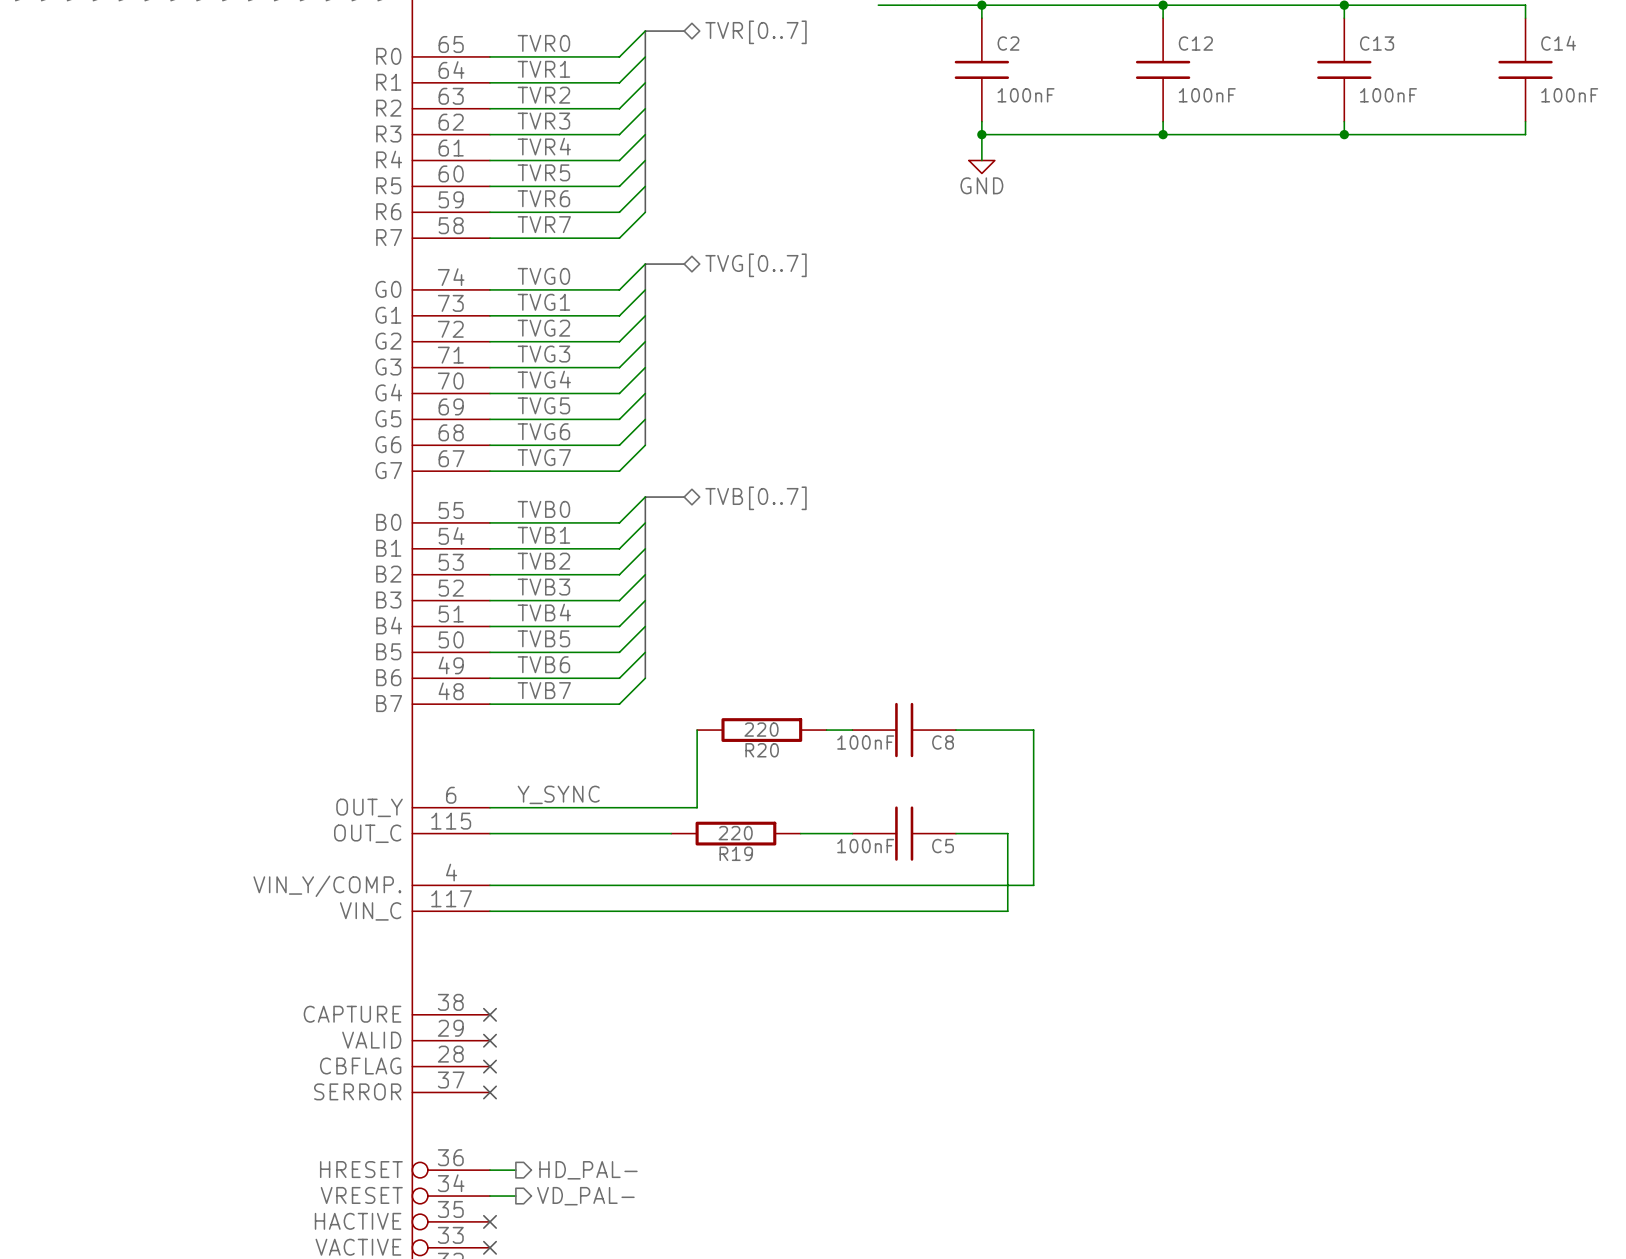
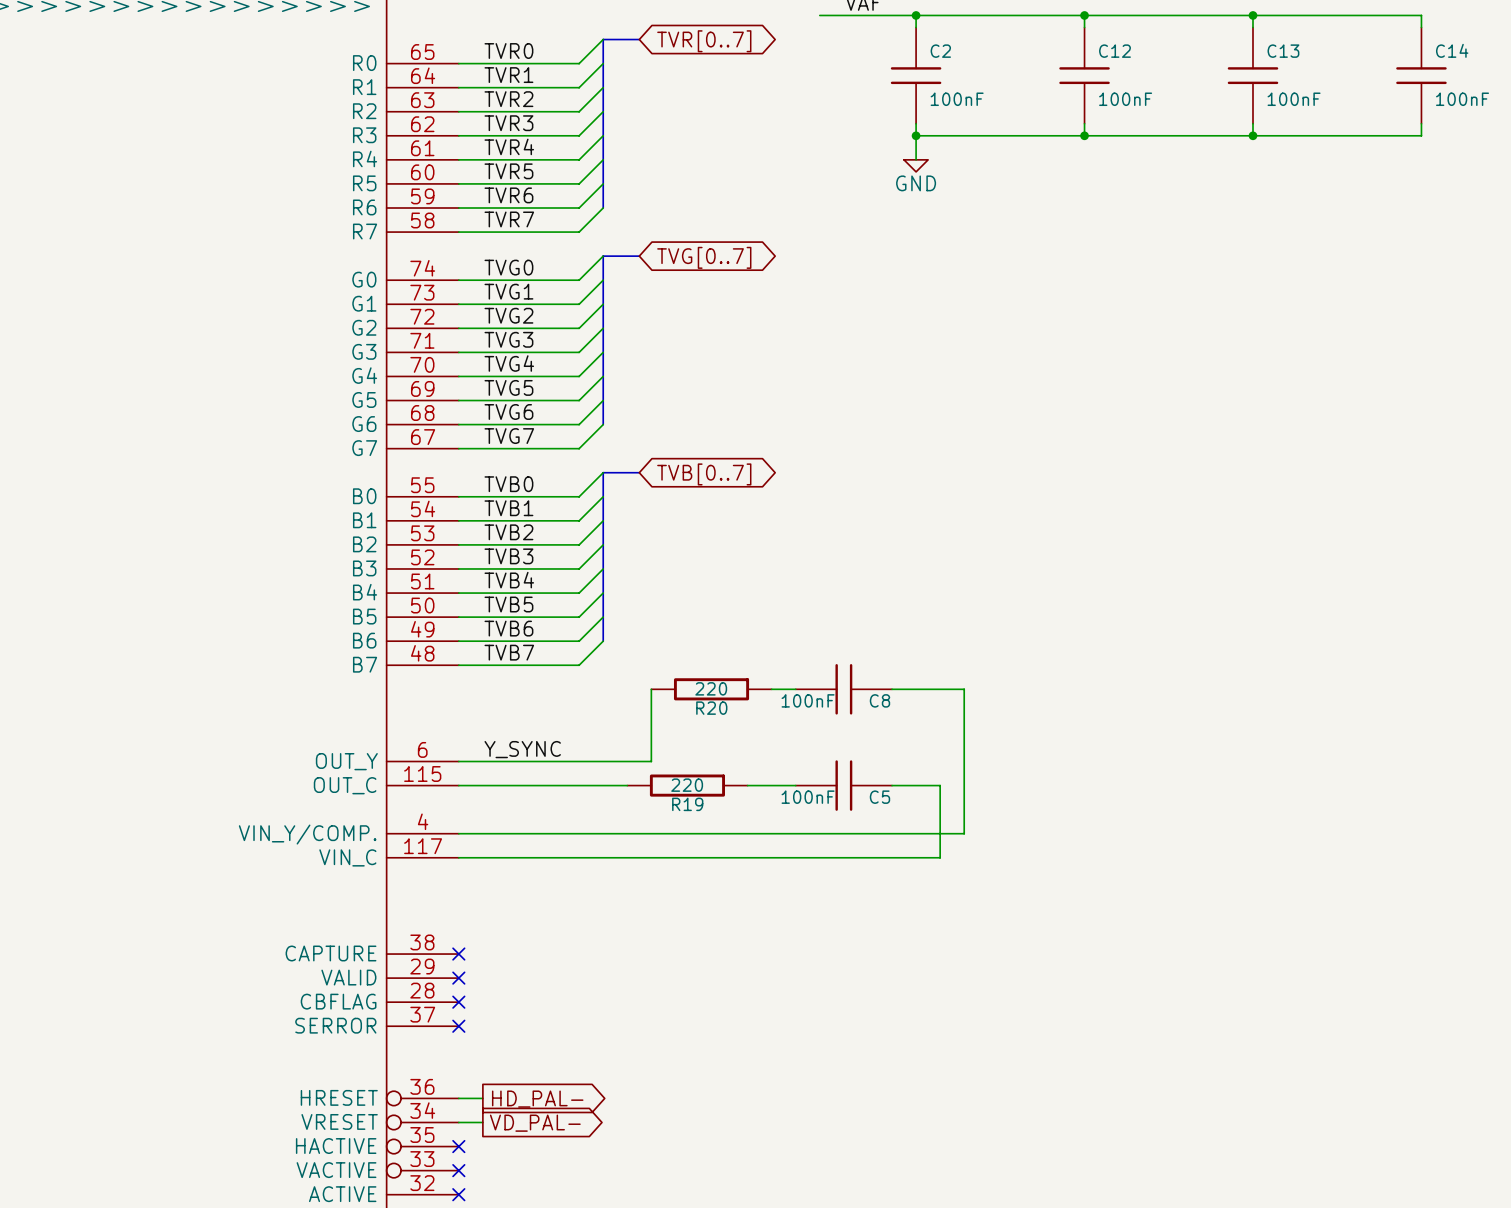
global label: none -> TVR[0..7] (704, 41)
hierarchical label: TVR[0..7] (756, 32) -> none
global label: none -> TVG[0..7] (704, 257)
hierarchical label: TVG[0..7] (756, 265) -> none
global label: none -> TVB[0..7] (704, 474)
hierarchical label: TVB[0..7] (756, 498) -> none
global label: none -> HD_PAL- (537, 1099)
hierarchical label: HD_PAL- (588, 1170) -> none
global label: none -> VD_PAL- (535, 1123)
hierarchical label: VD_PAL- (585, 1196) -> none

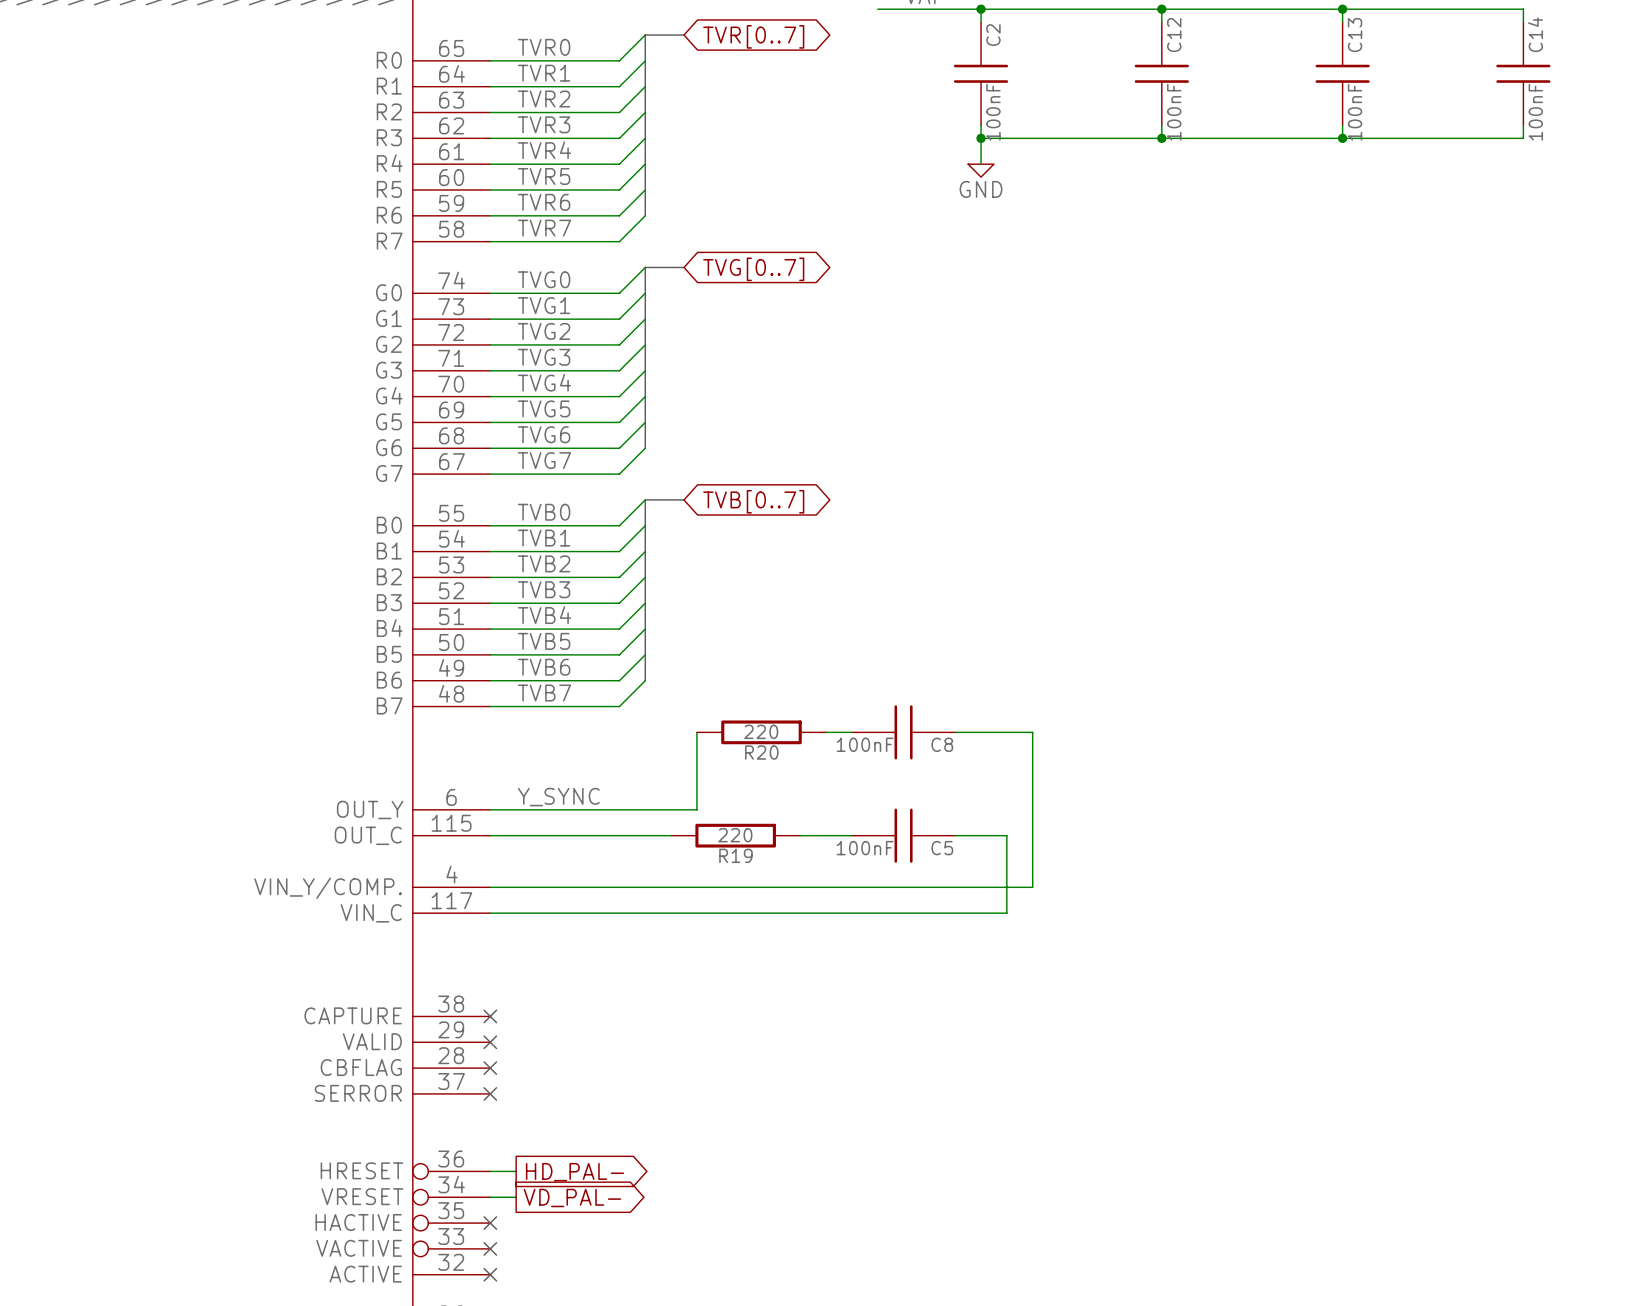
C14 name rotation: 0° (1452, 50) -> 90° counterclockwise (1535, 34)
C2 name rotation: 0° (940, 51) -> 90° counterclockwise (993, 35)
C12 name rotation: 0° (1114, 51) -> 90° counterclockwise (1174, 35)
C13 name rotation: 0° (1283, 51) -> 90° counterclockwise (1355, 35)
C2 value rotation: 0° (957, 99) -> 90° counterclockwise (993, 112)
C12 value rotation: 0° (1125, 99) -> 90° counterclockwise (1174, 112)
C13 value rotation: 0° (1294, 99) -> 90° counterclockwise (1355, 112)
C14 value rotation: 0° (1462, 99) -> 90° counterclockwise (1535, 112)

